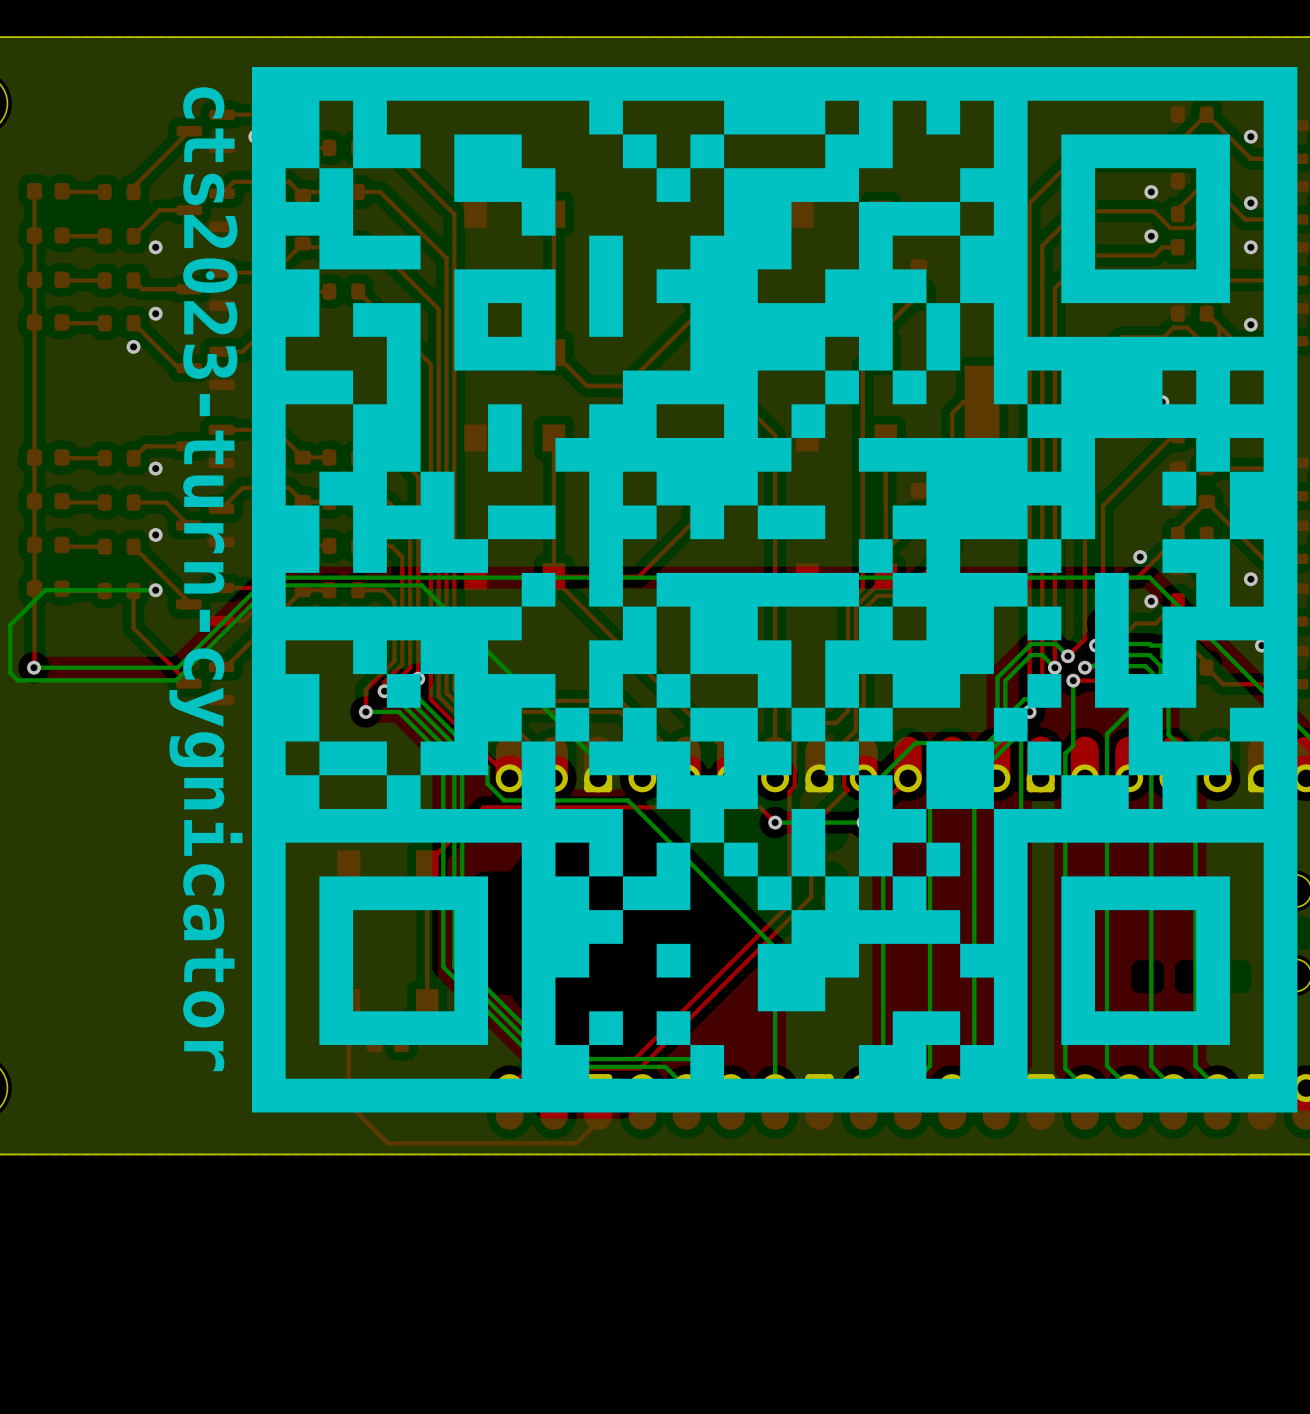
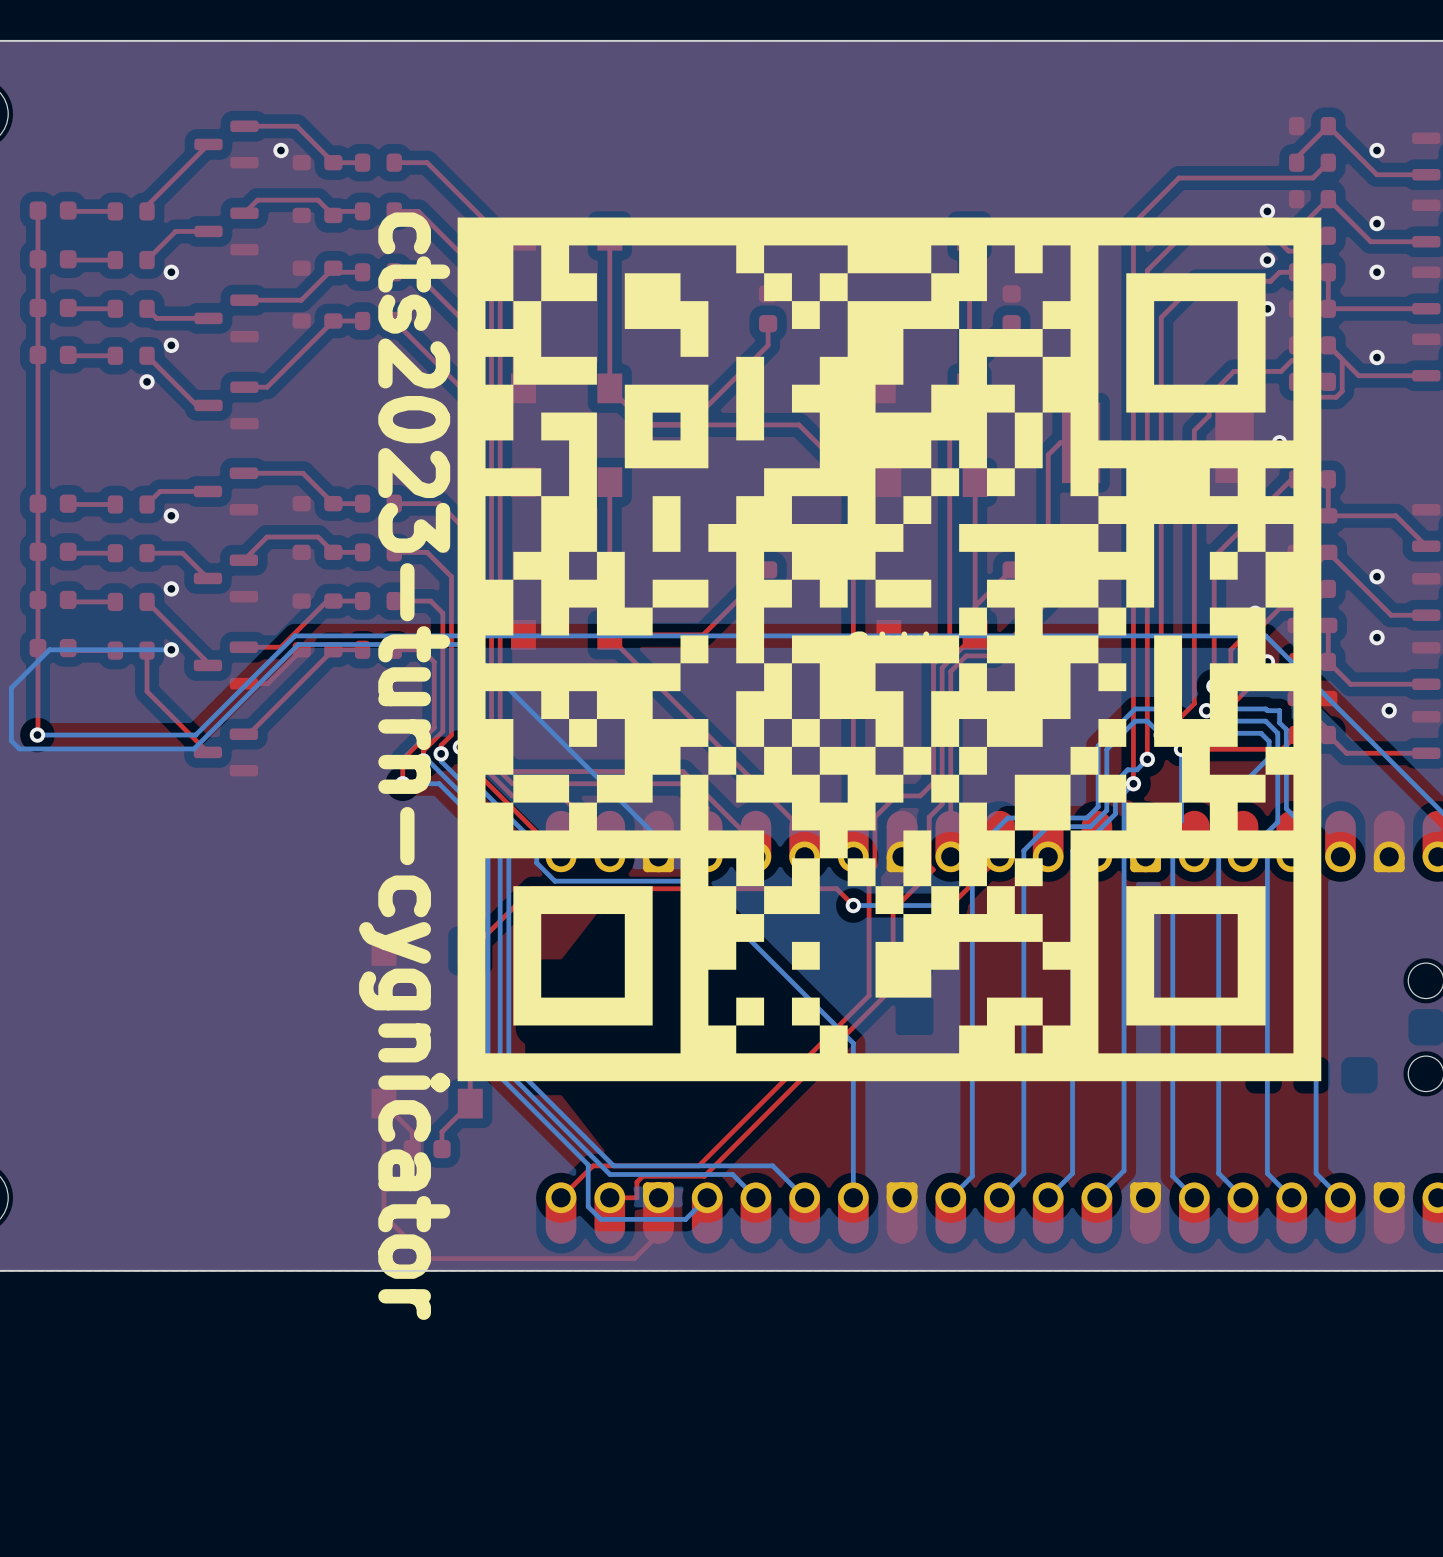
text position: cts2023-turn-cygnicator (205, 579) -> cts2023-turn-cygnicator (404, 766)
part: (774, 589) -> none
part: none -> (889, 649)

